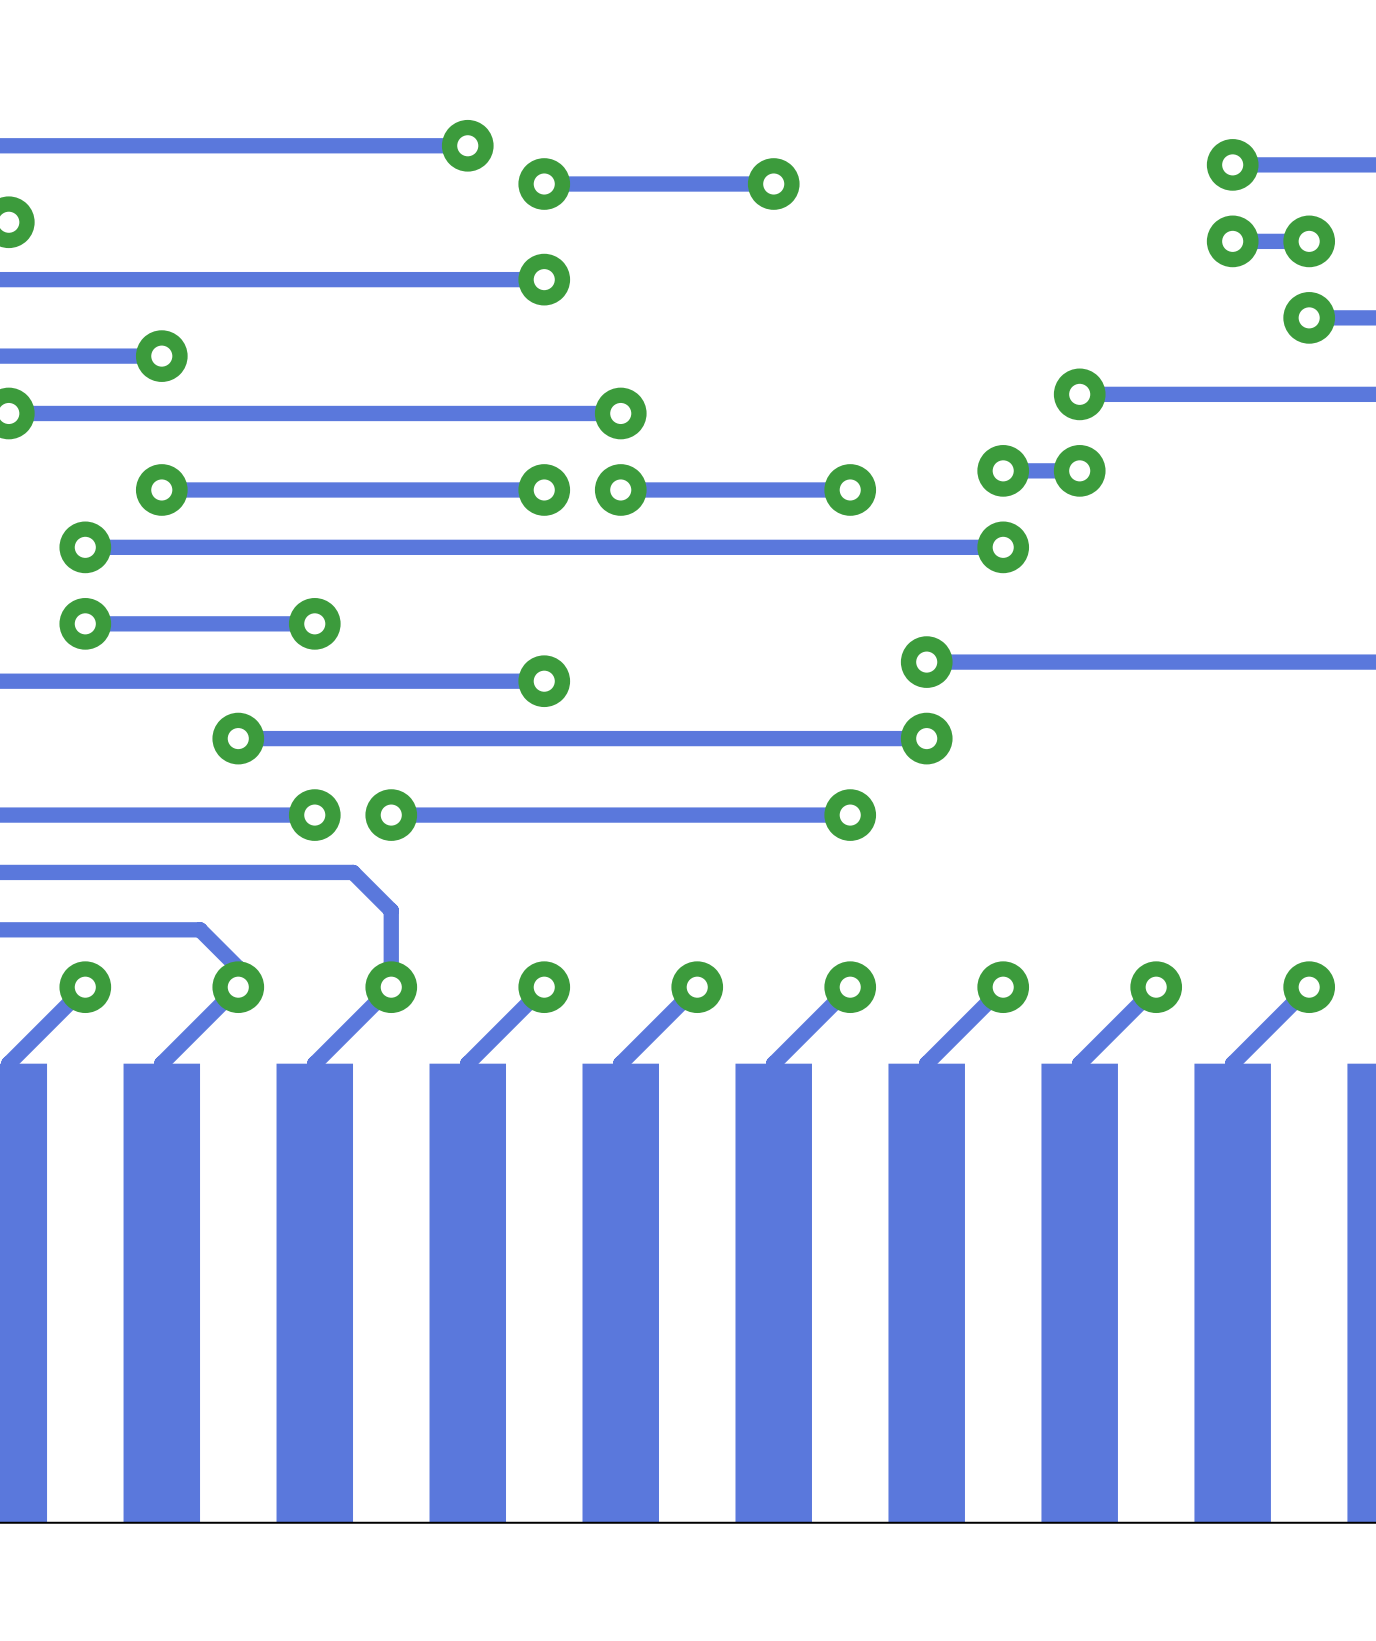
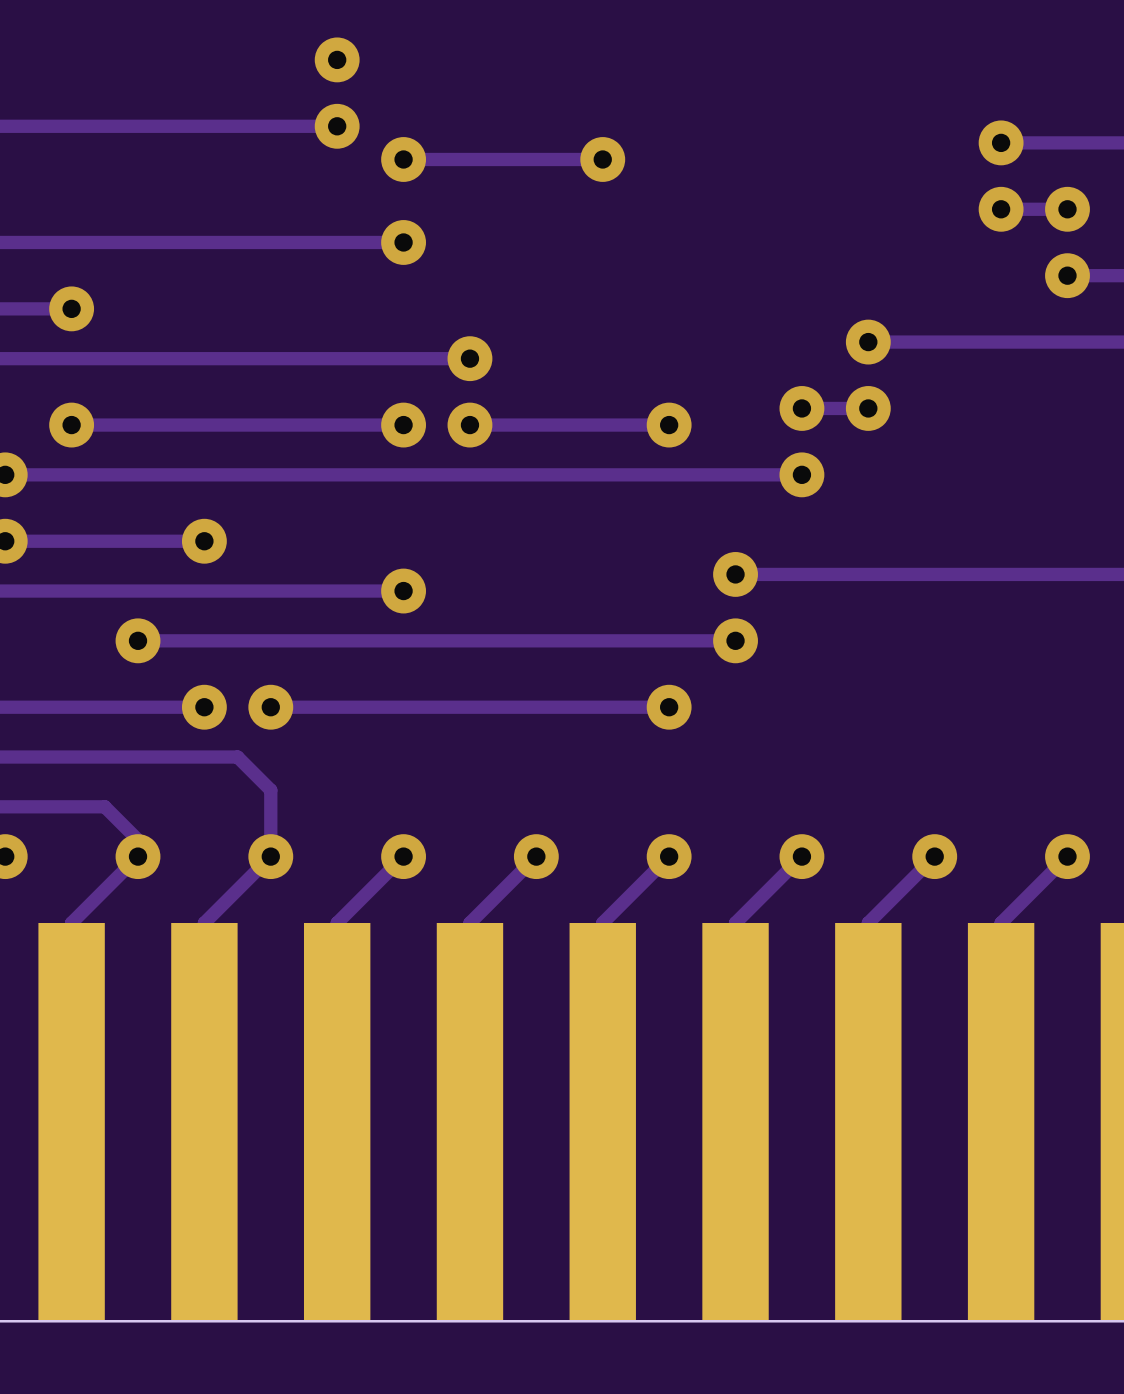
via: none -> (337, 59)

